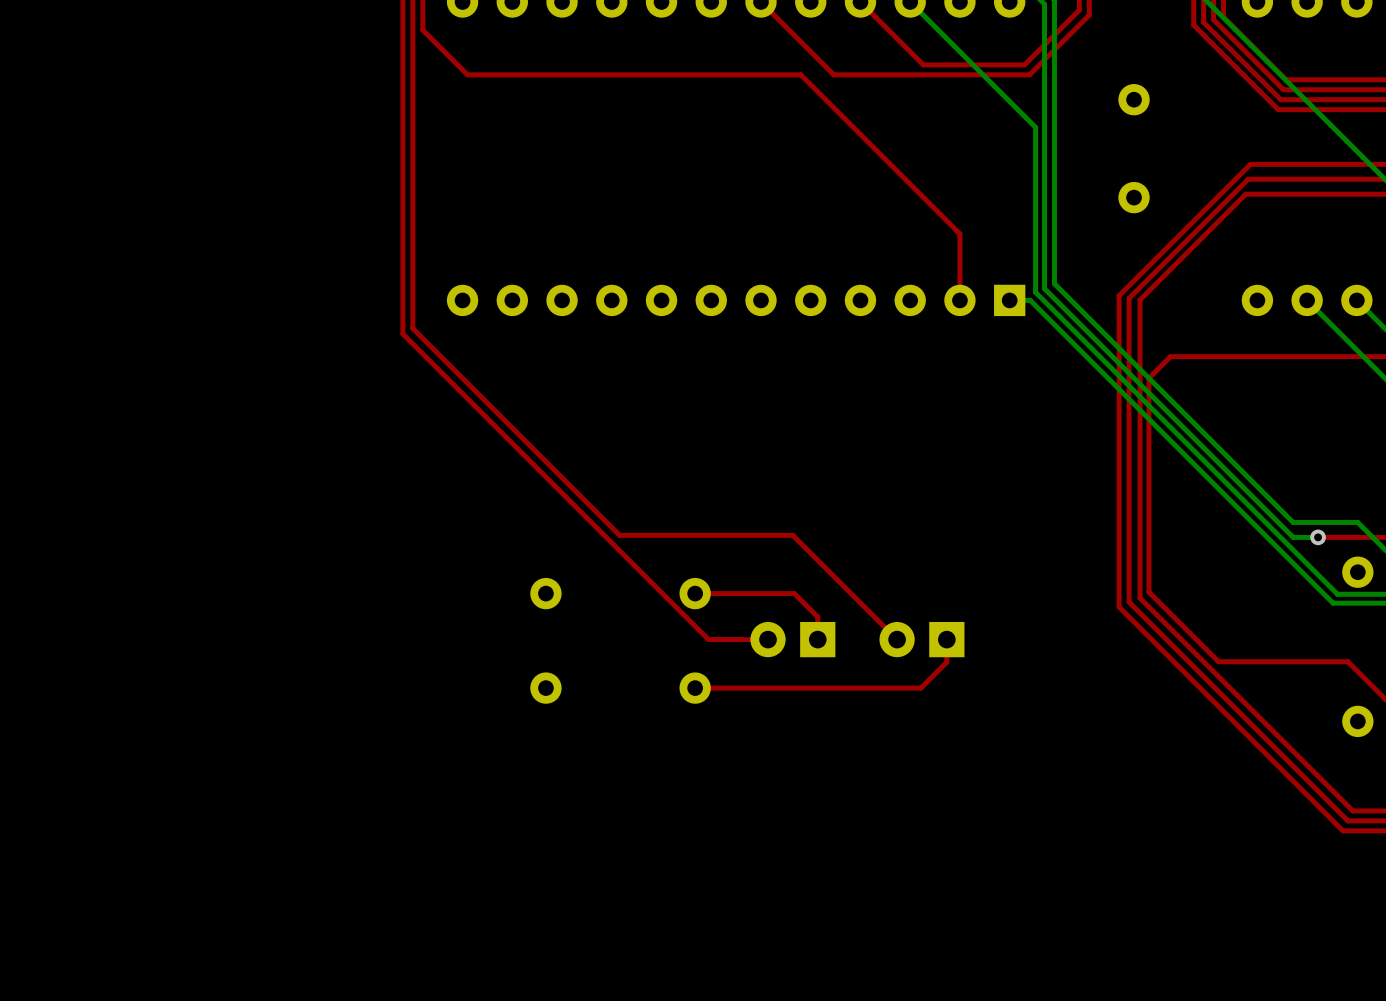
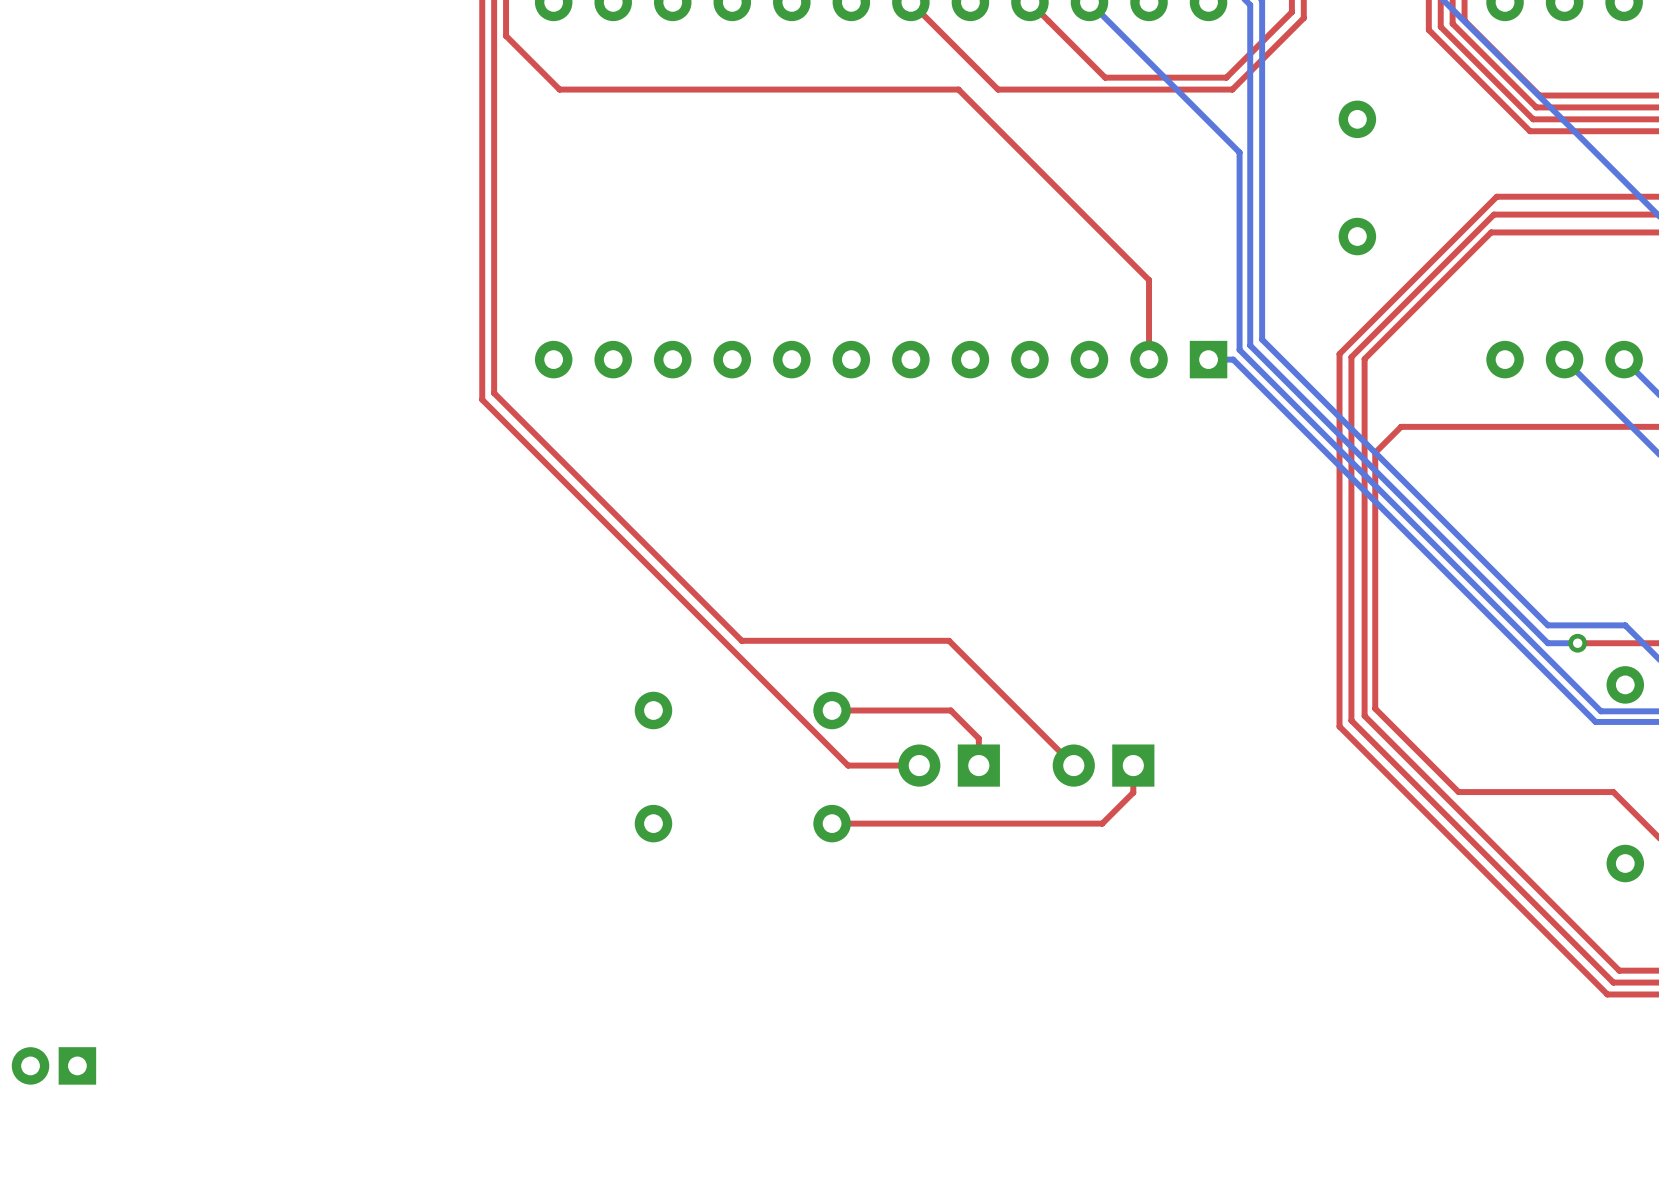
part: none -> (53, 1065)

